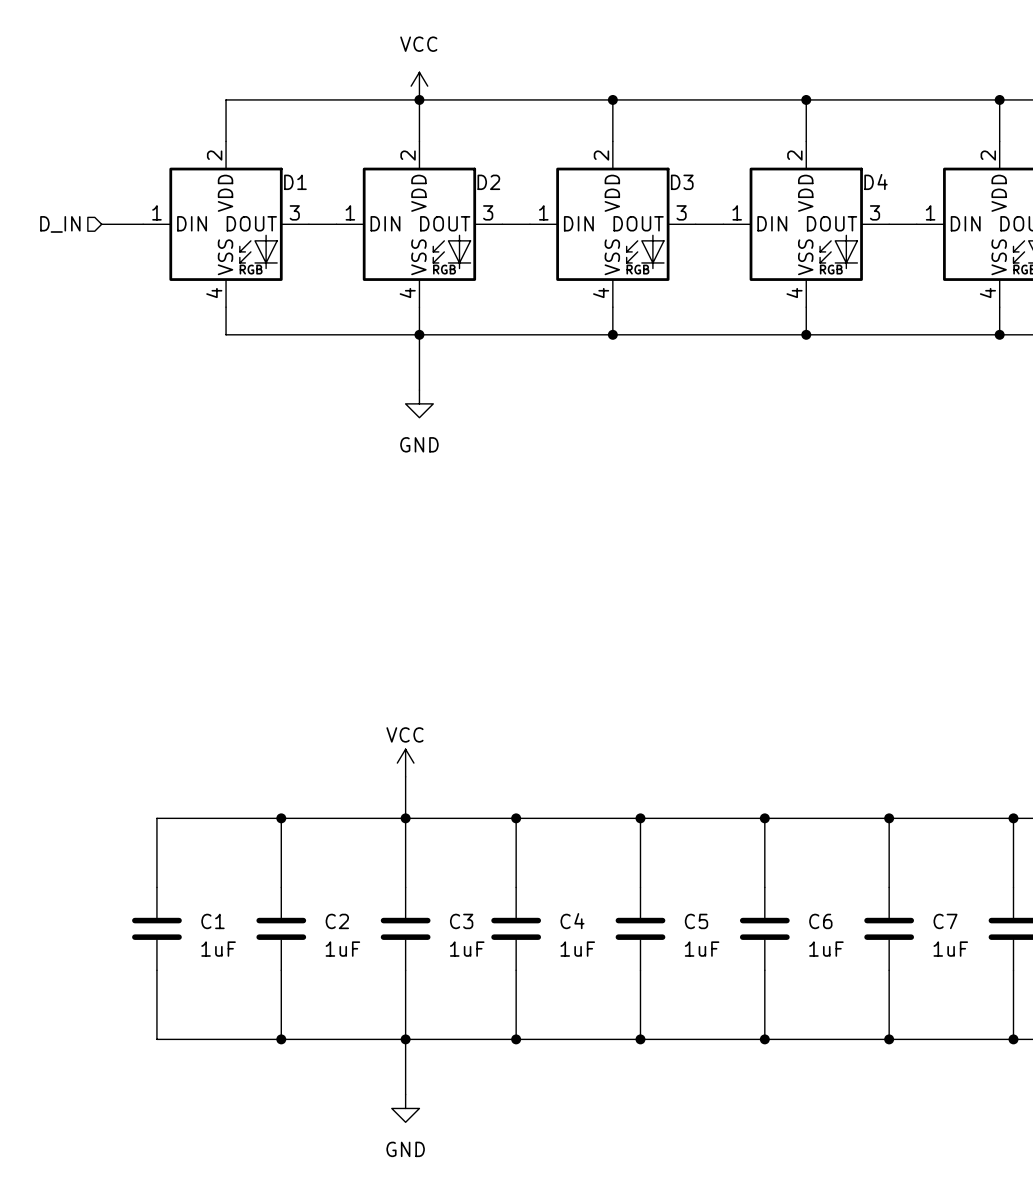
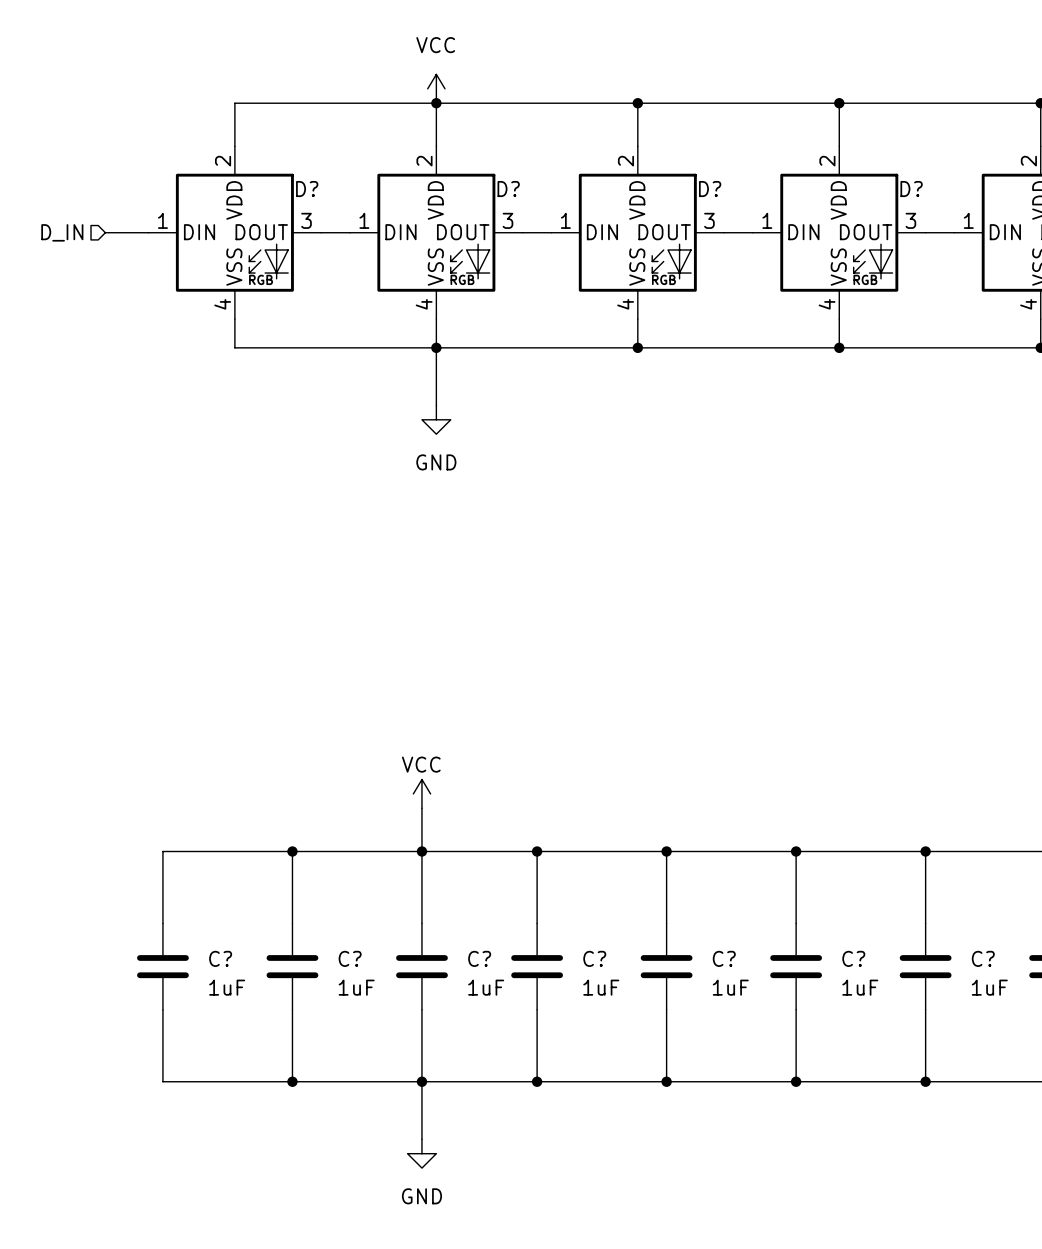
D1 name: D1 (295, 182) -> D? (307, 189)
D2 name: D2 (488, 182) -> D? (508, 189)
D3 name: D3 (682, 182) -> D? (710, 189)
D4 name: D4 (876, 182) -> D? (911, 189)
C1 name: C1 (212, 921) -> C? (220, 958)
C2 name: C2 (337, 921) -> C? (350, 958)
C3 name: C3 (461, 921) -> C? (479, 958)
C4 name: C4 (572, 921) -> C? (594, 958)
C5 name: C5 (696, 921) -> C? (724, 958)
C6 name: C6 (820, 921) -> C? (853, 958)
C7 name: C7 (945, 921) -> C? (983, 958)

